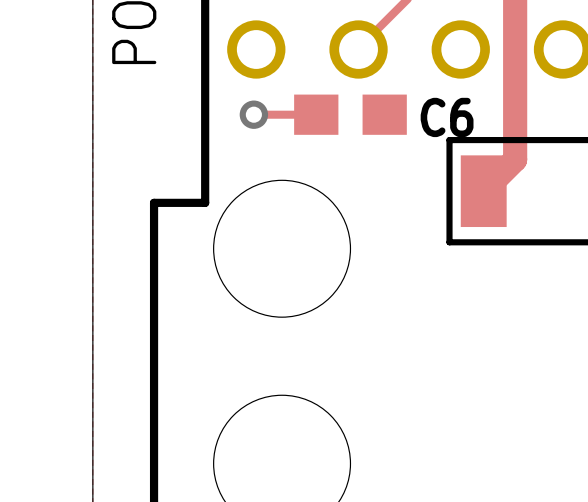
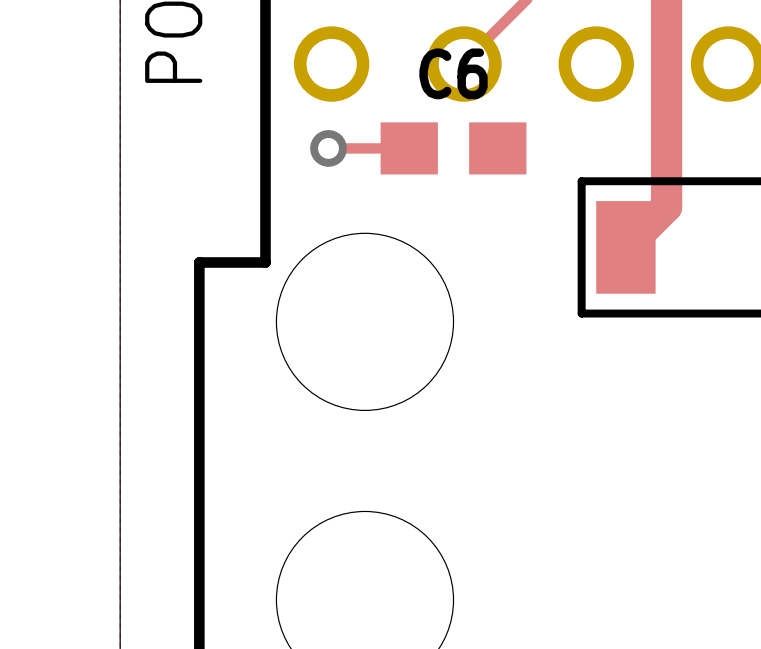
C6 name position: C6 (447, 117) -> C6 (453, 73)

